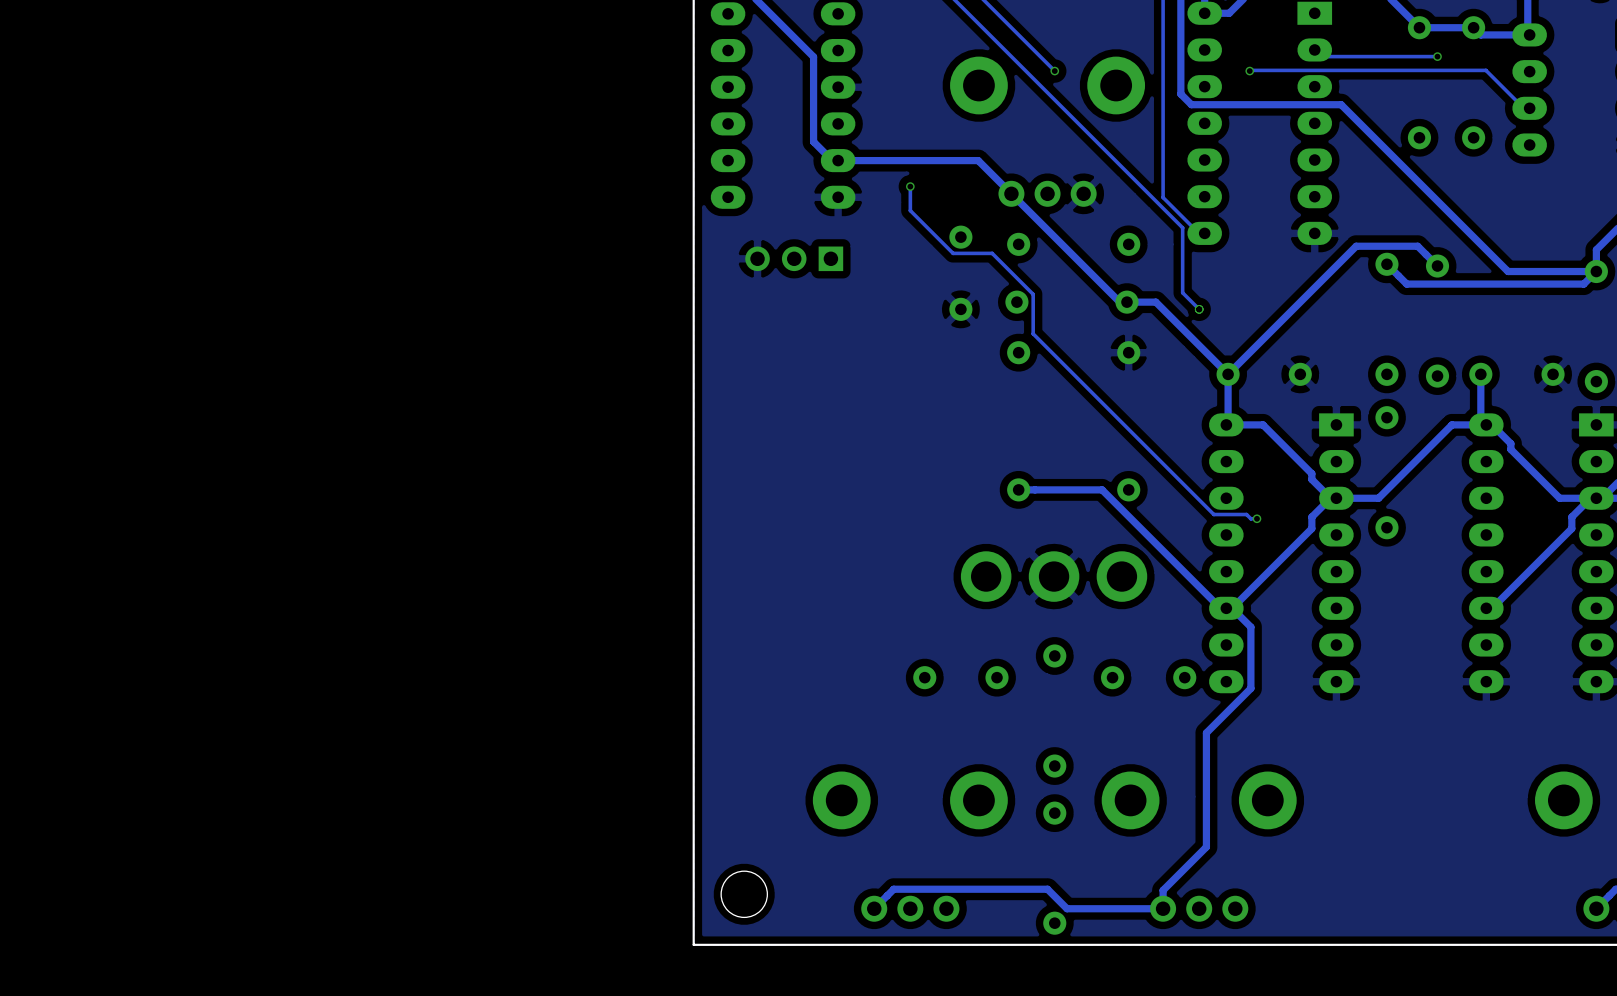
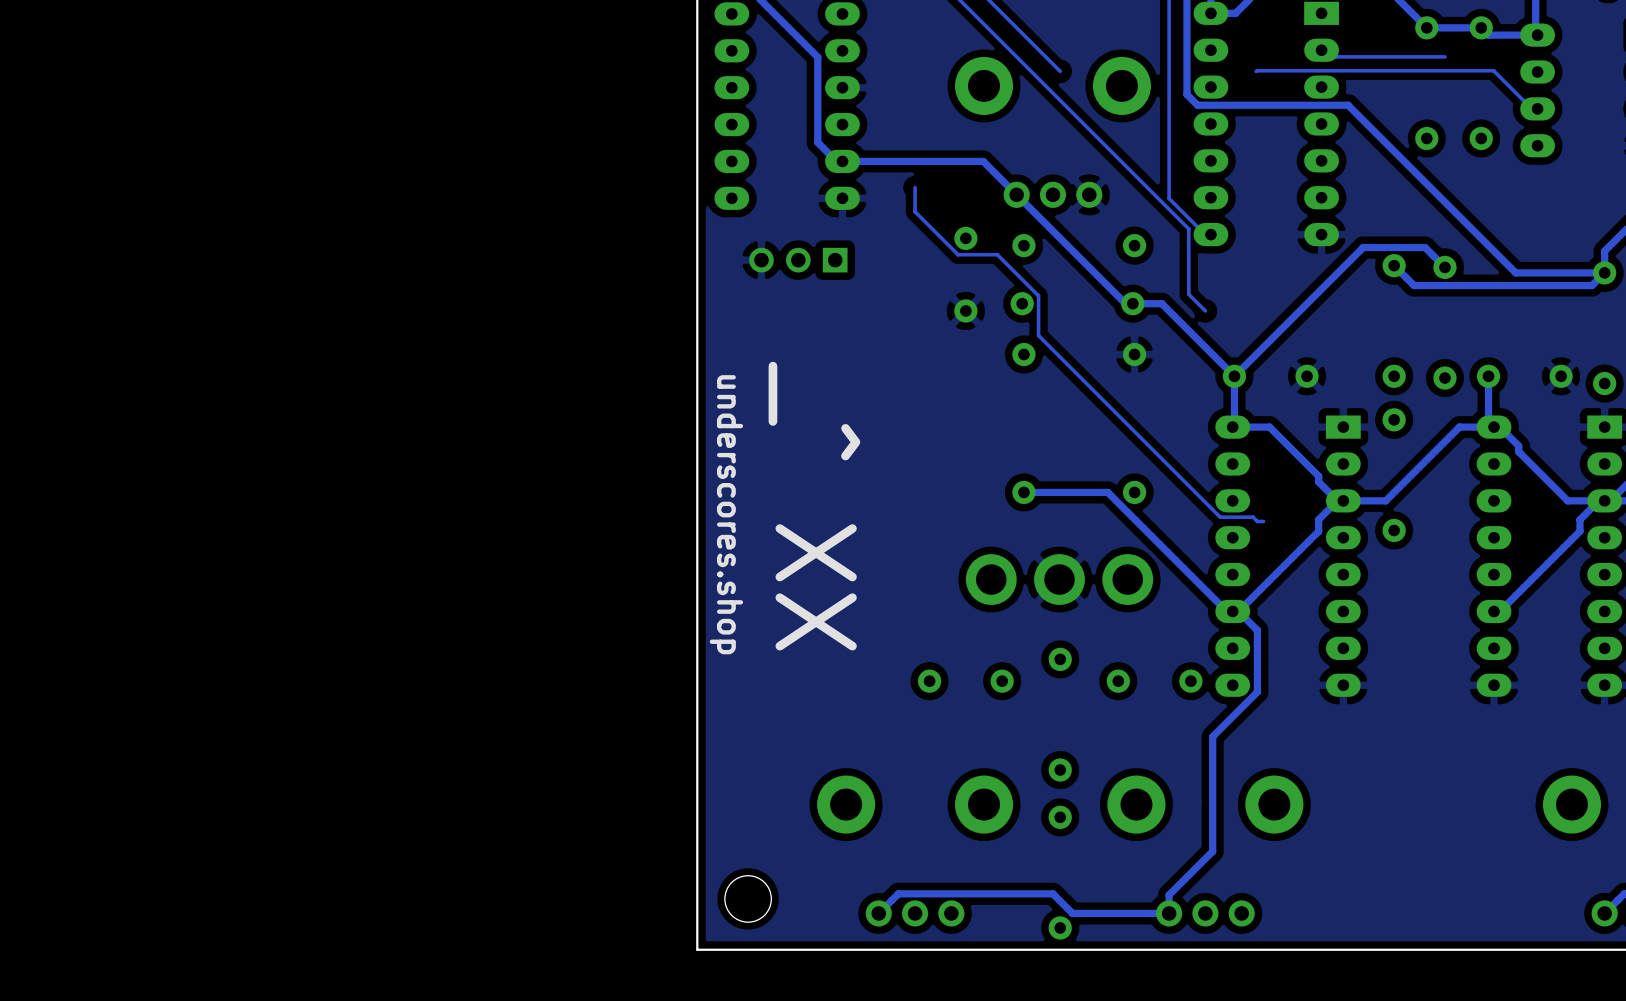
via: (1437, 56) -> none
via: (1054, 71) -> none
via: (1249, 71) -> none
via: (910, 186) -> none
via: (1199, 309) -> none
text: none -> _^ XX (814, 506)
text: none -> underscores.shop (726, 514)
via: (1256, 518) -> none

